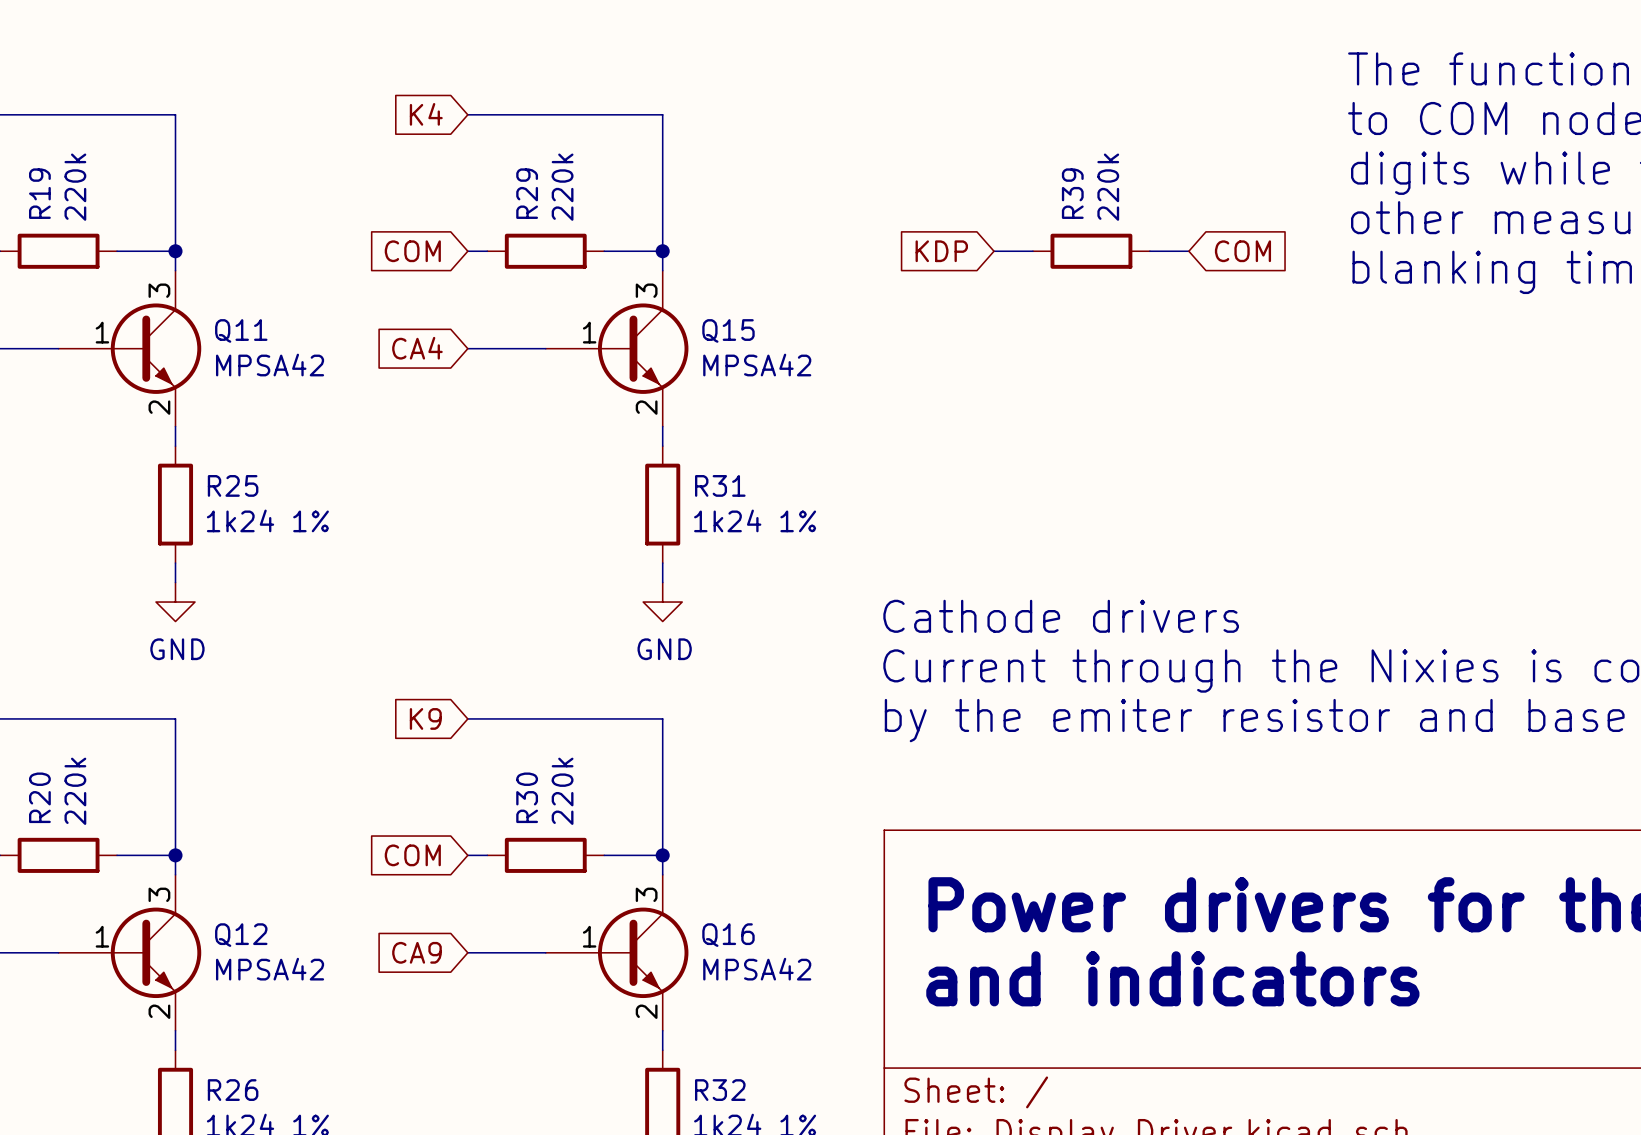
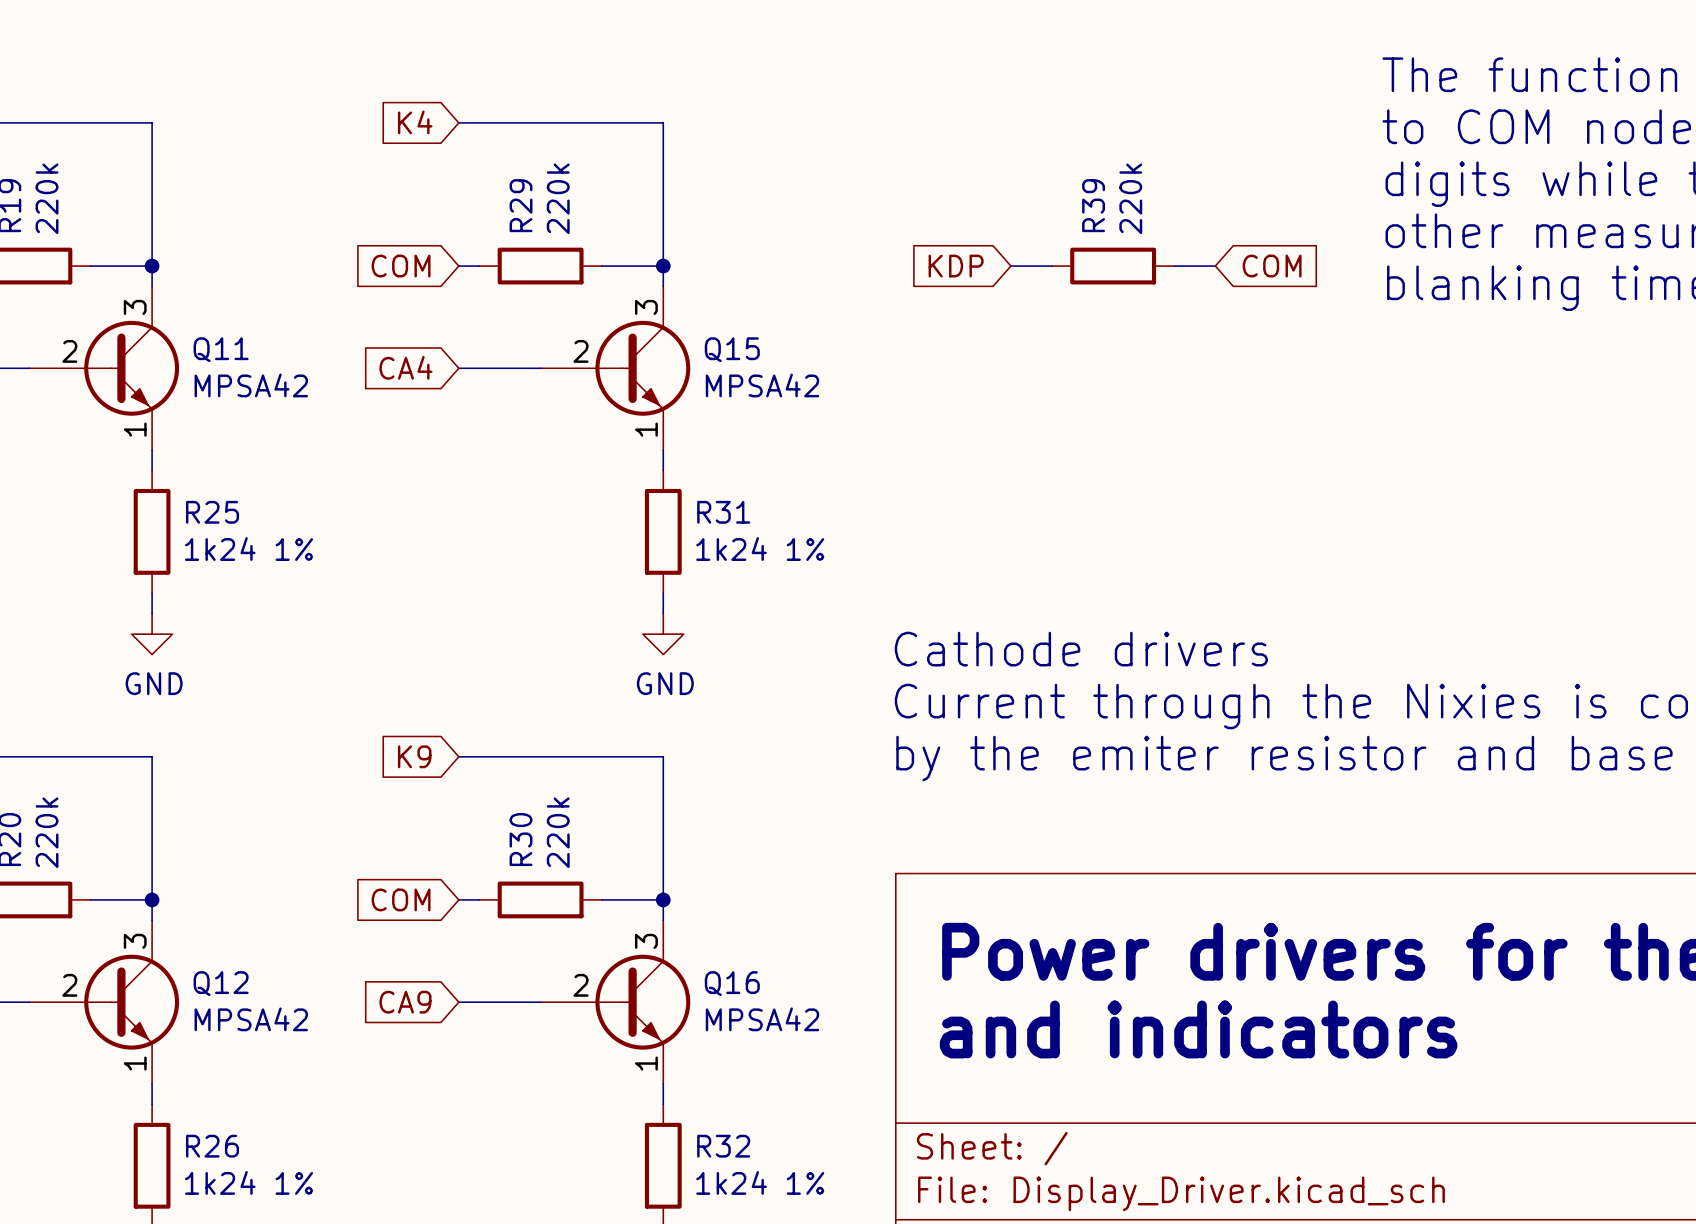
Q11 symbol: [58, 270, 202, 427] -> [29, 286, 180, 451]
Q15 symbol: [545, 270, 689, 427] -> [540, 286, 691, 451]
Q12 symbol: [58, 874, 202, 1031] -> [29, 920, 180, 1084]
Q16 symbol: [545, 874, 689, 1031] -> [540, 920, 691, 1084]

